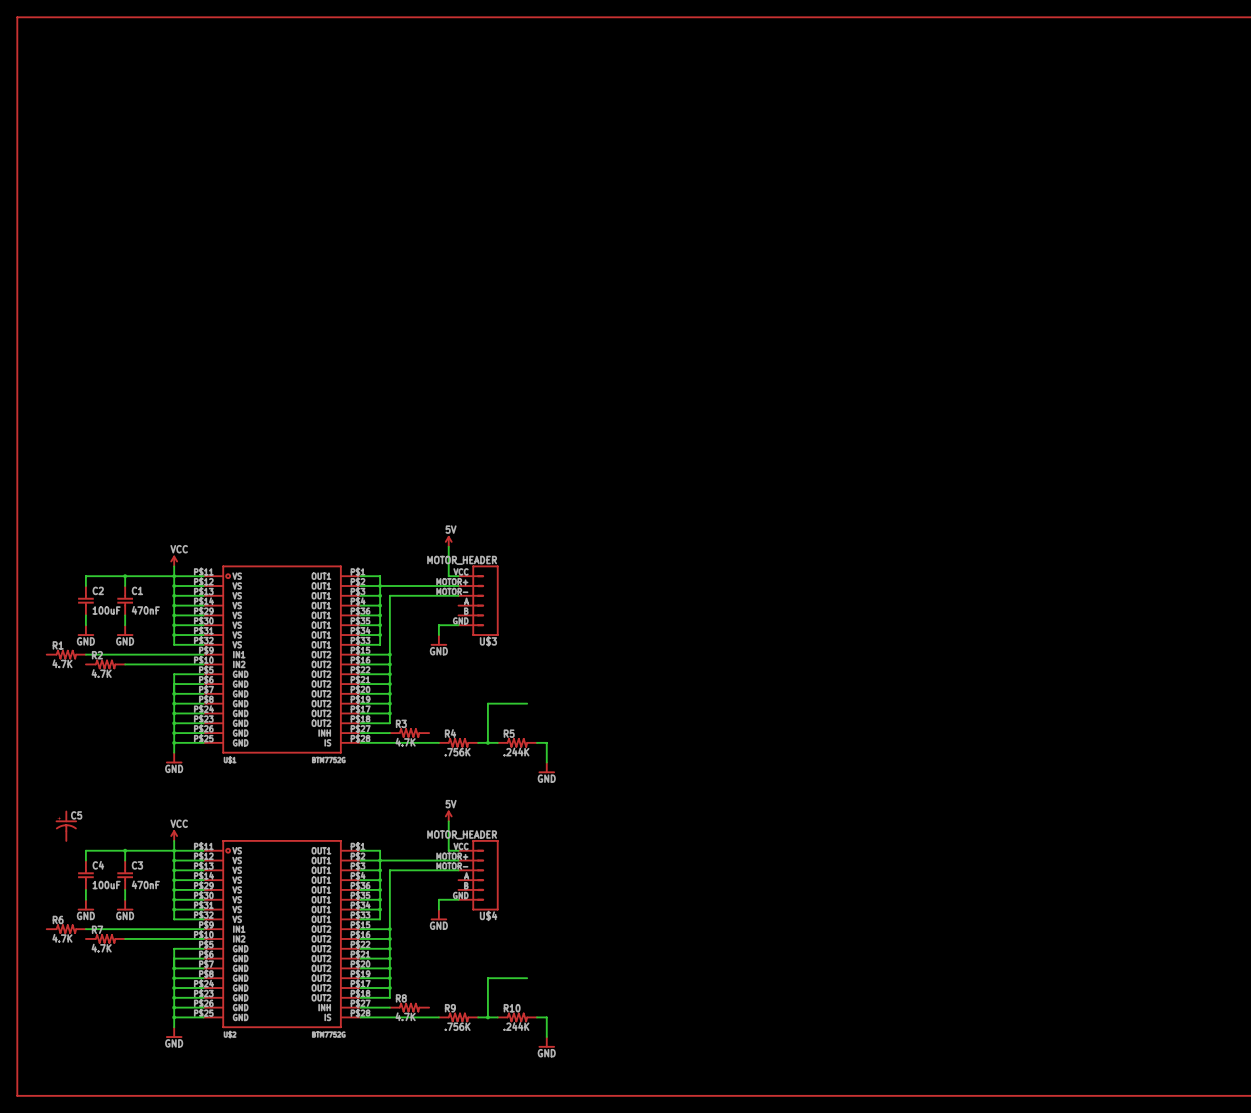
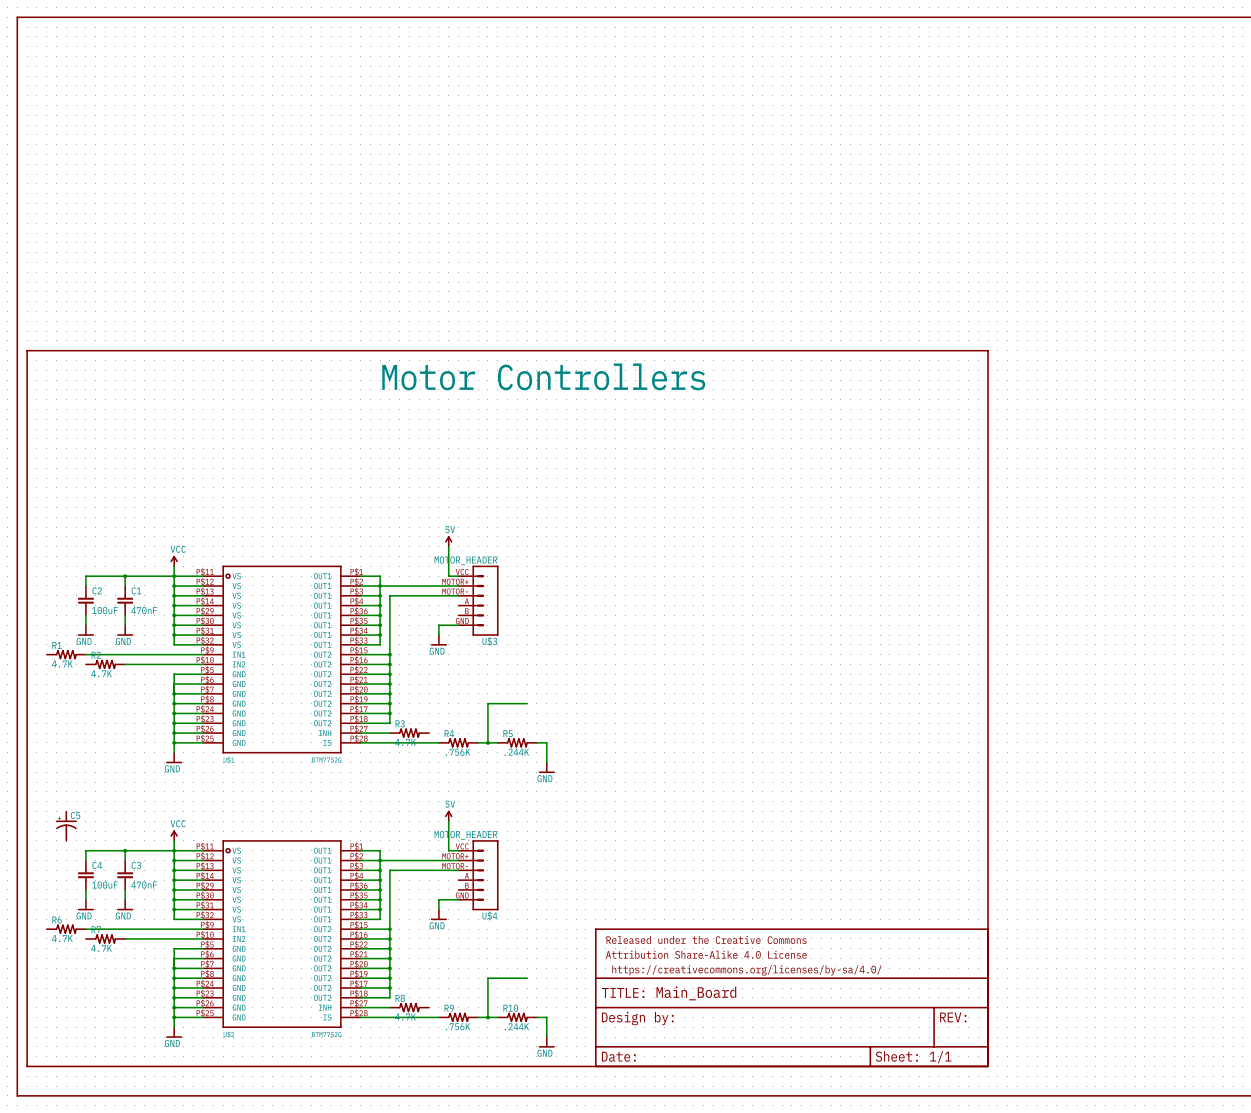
text: none -> Motor Controllers (543, 376)
part: none -> (507, 708)
part: none -> (791, 997)

